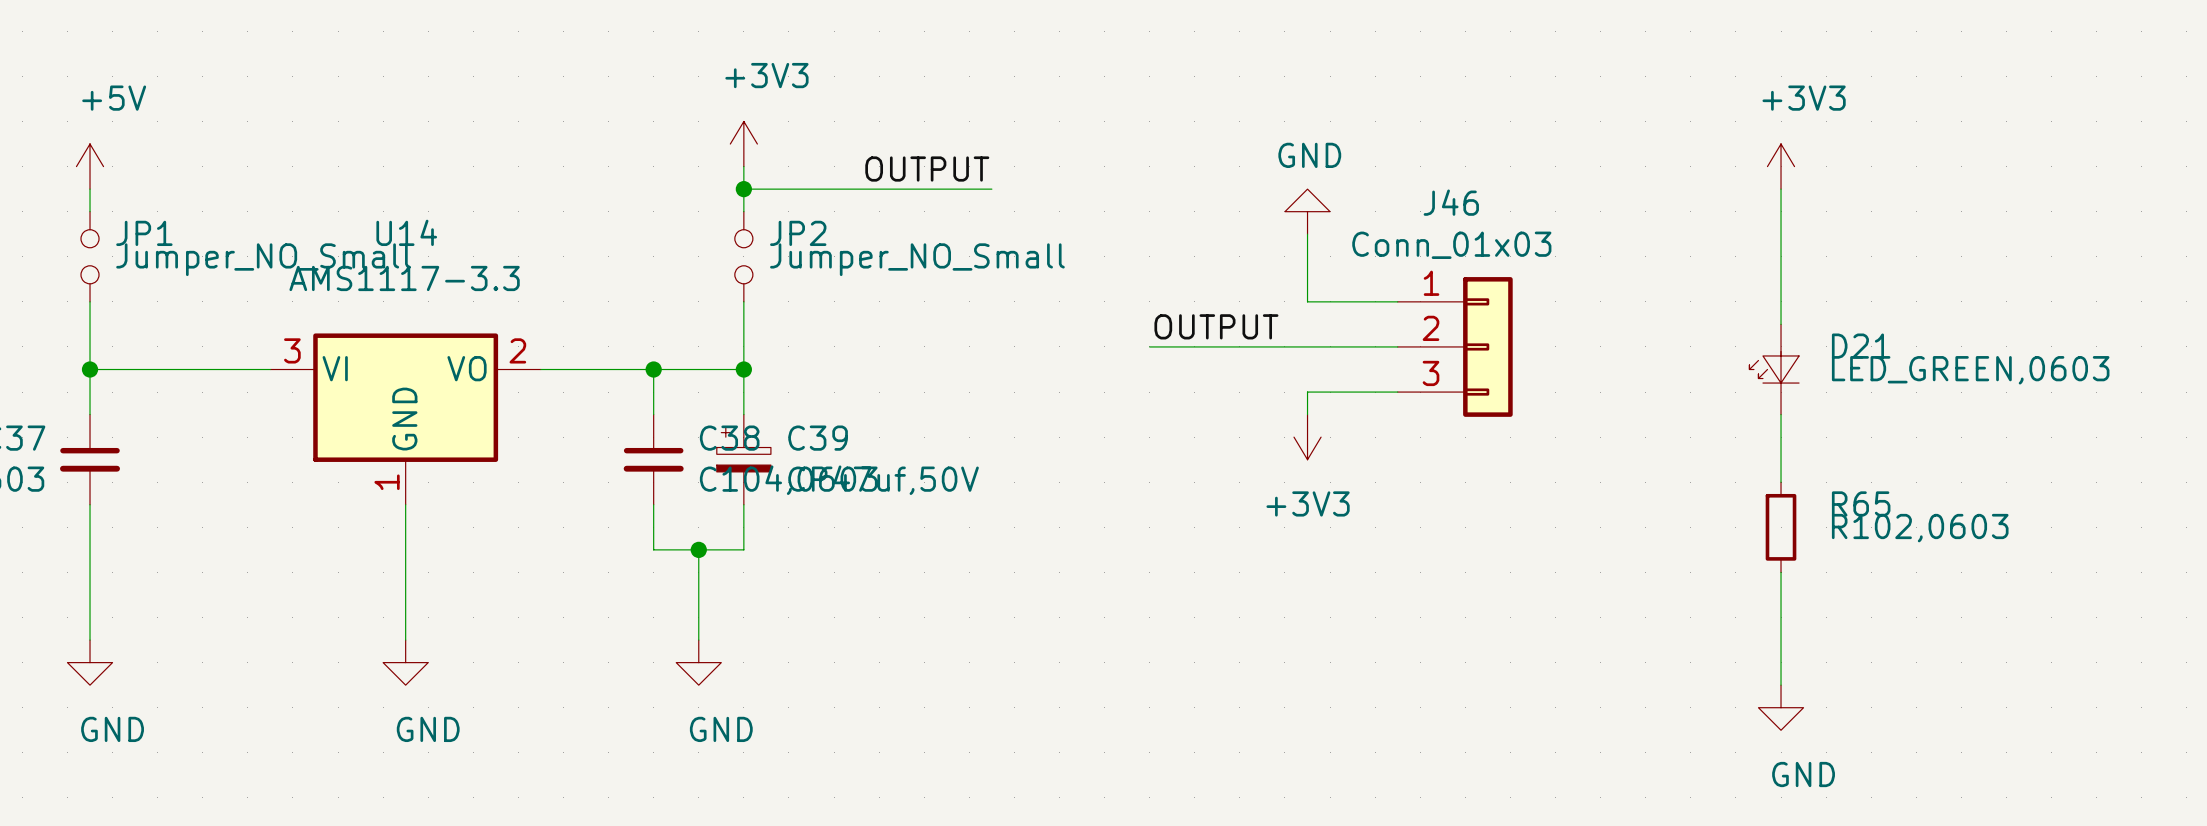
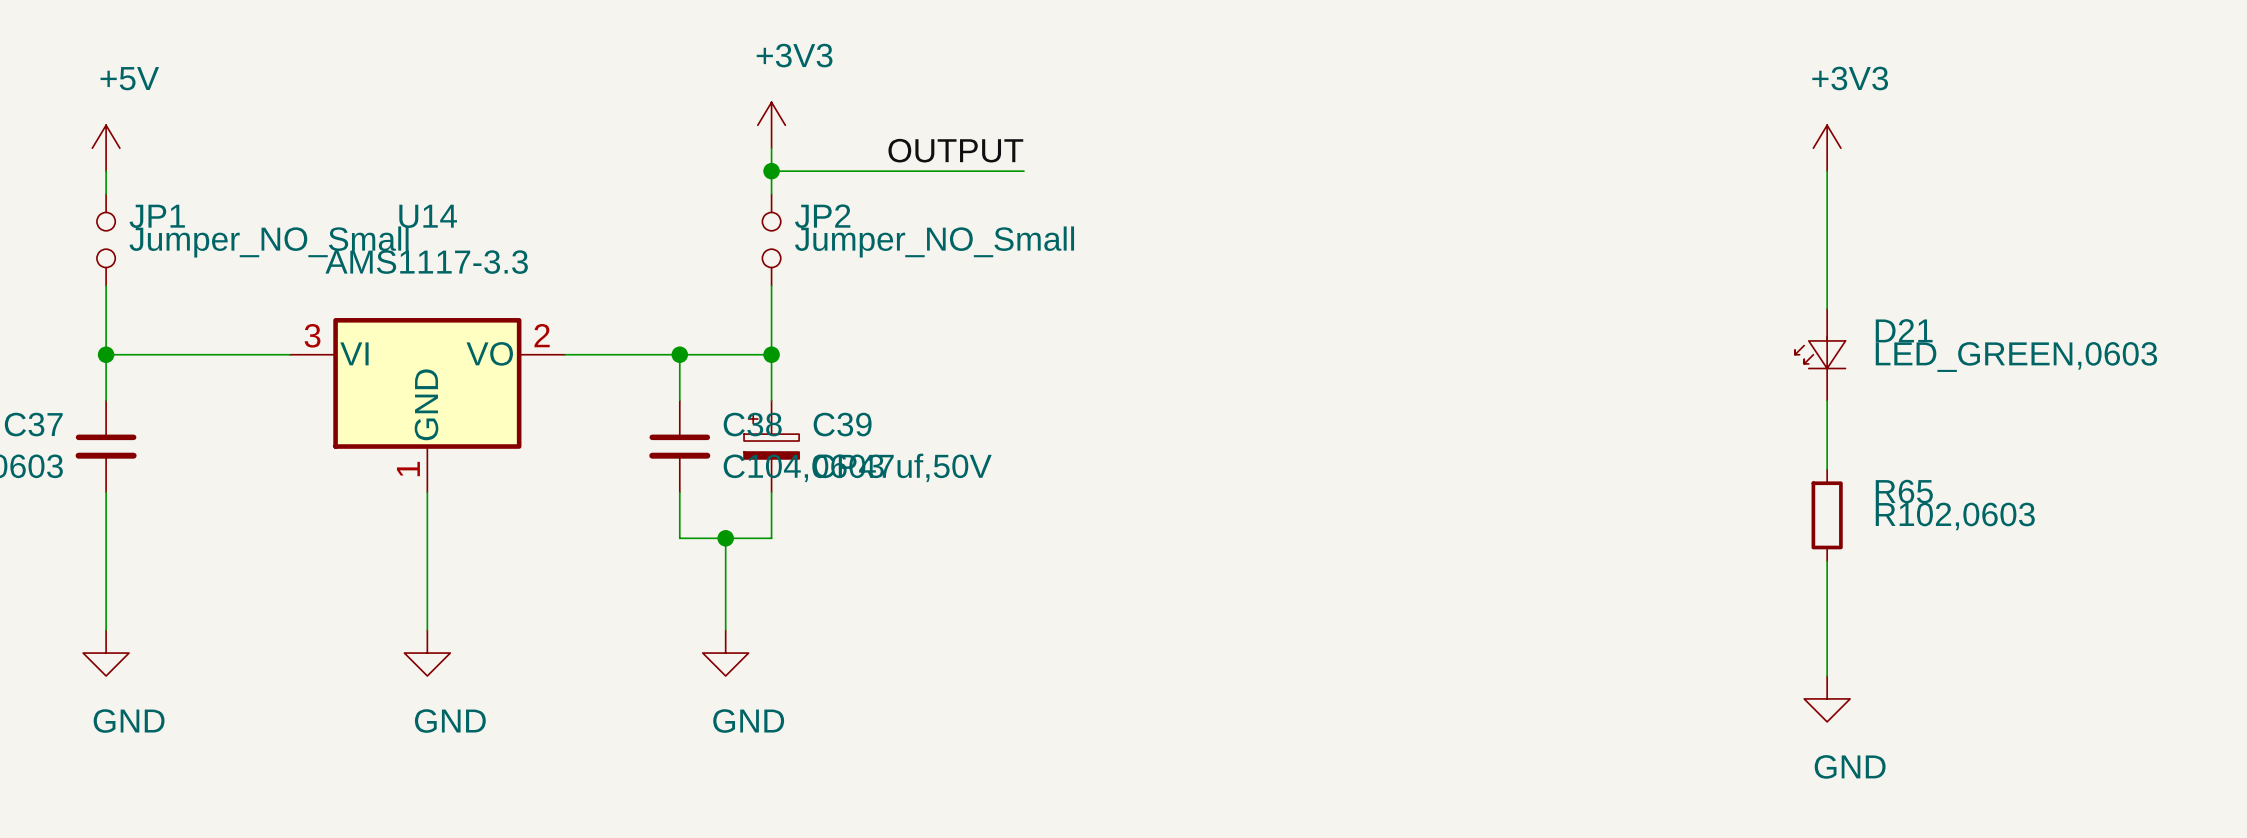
power symbol: GND (1307, 211) -> none
wire: (1307, 234) (1307, 301) (1397, 301) -> none
label: OUTPUT (1216, 326) -> none
wire: (1149, 346) (1397, 346) -> none
J46: Conn_01x03 (1455, 346) -> none
wire: (1397, 392) (1307, 392) (1307, 414) -> none
power symbol: +3V3 (1307, 437) -> none

